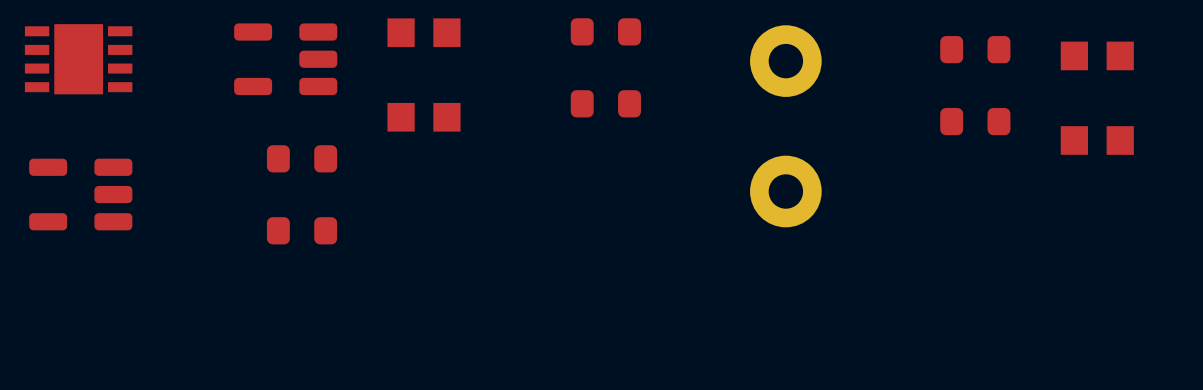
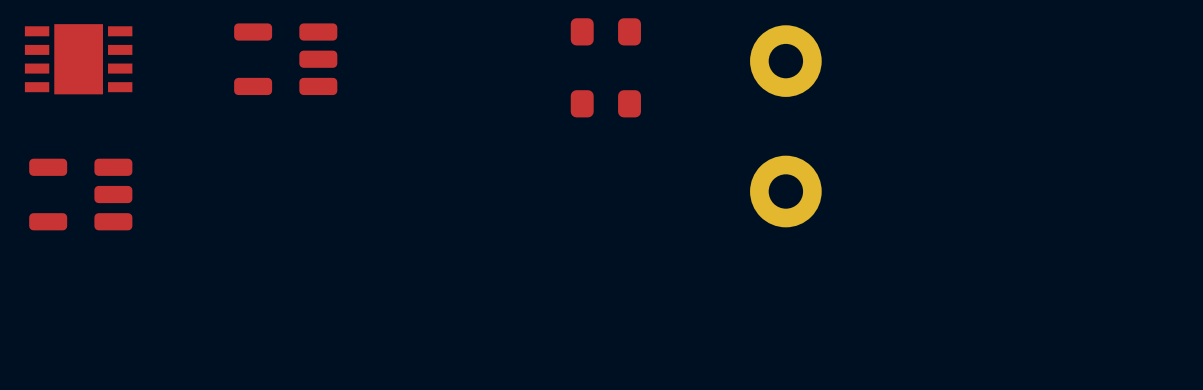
part: (424, 32) -> none
part: (975, 49) -> none
part: (1097, 55) -> none
part: (424, 117) -> none
part: (975, 121) -> none
part: (1097, 140) -> none
part: (302, 158) -> none
part: (302, 230) -> none

